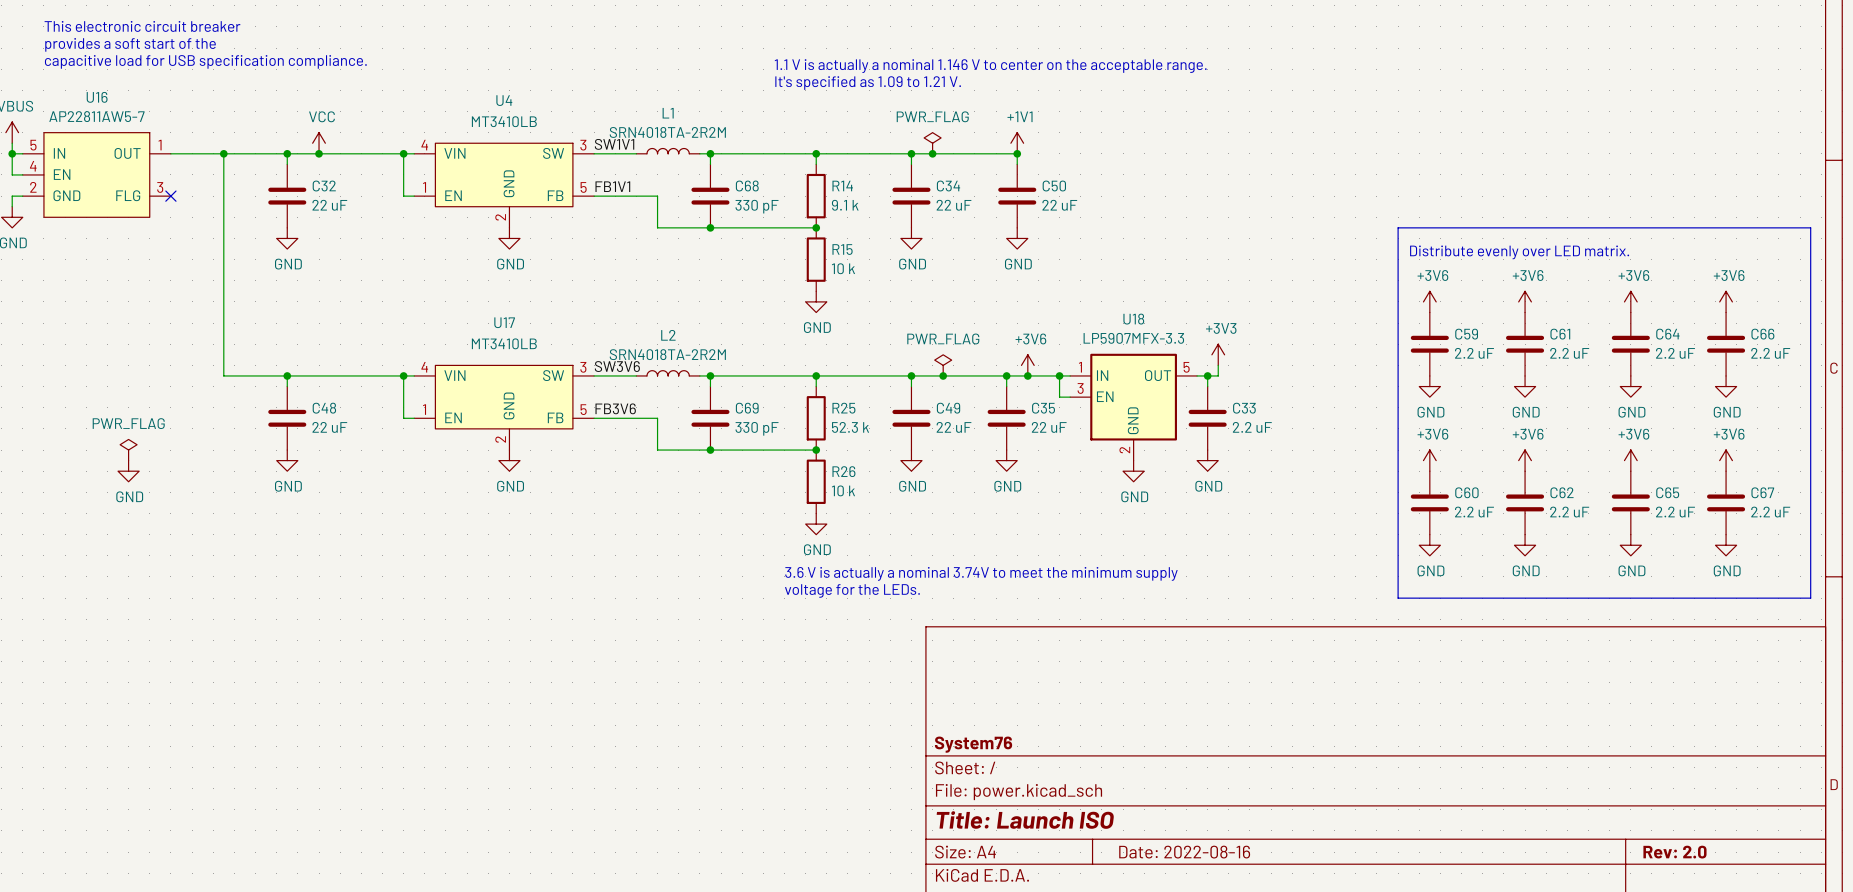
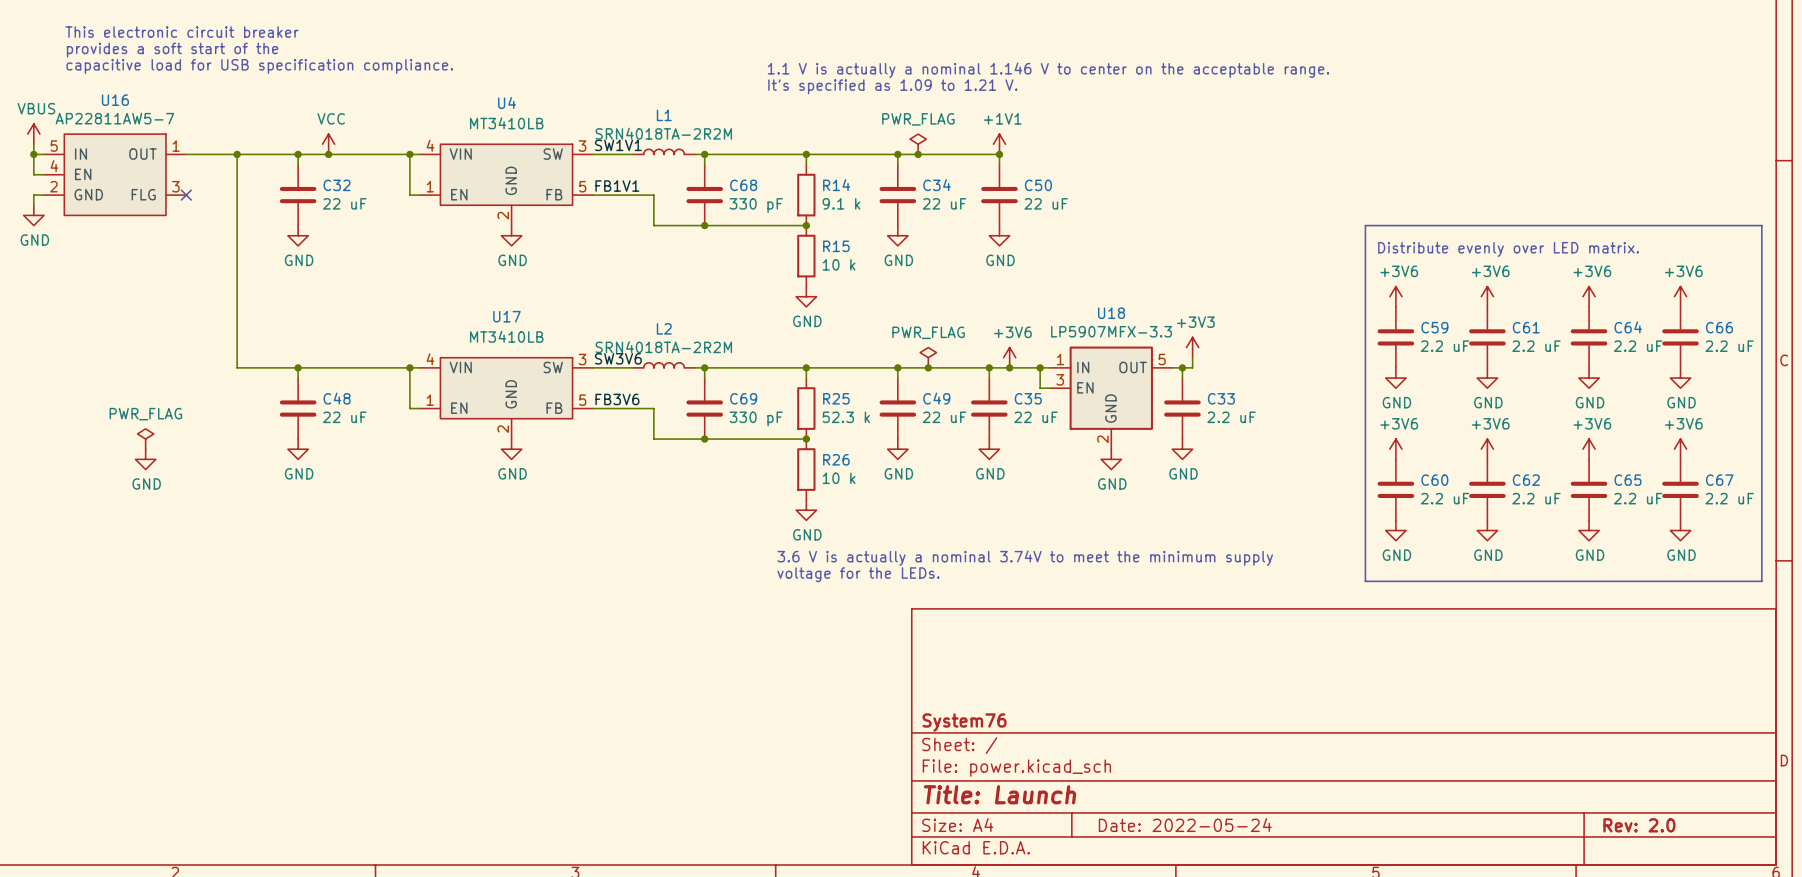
title block: Title: Launch ISO (1025, 820) -> Title: Launch (1000, 794)
title block: Date: 2022-08-16 (1184, 852) -> Date: 2022-05-24 (1185, 825)

